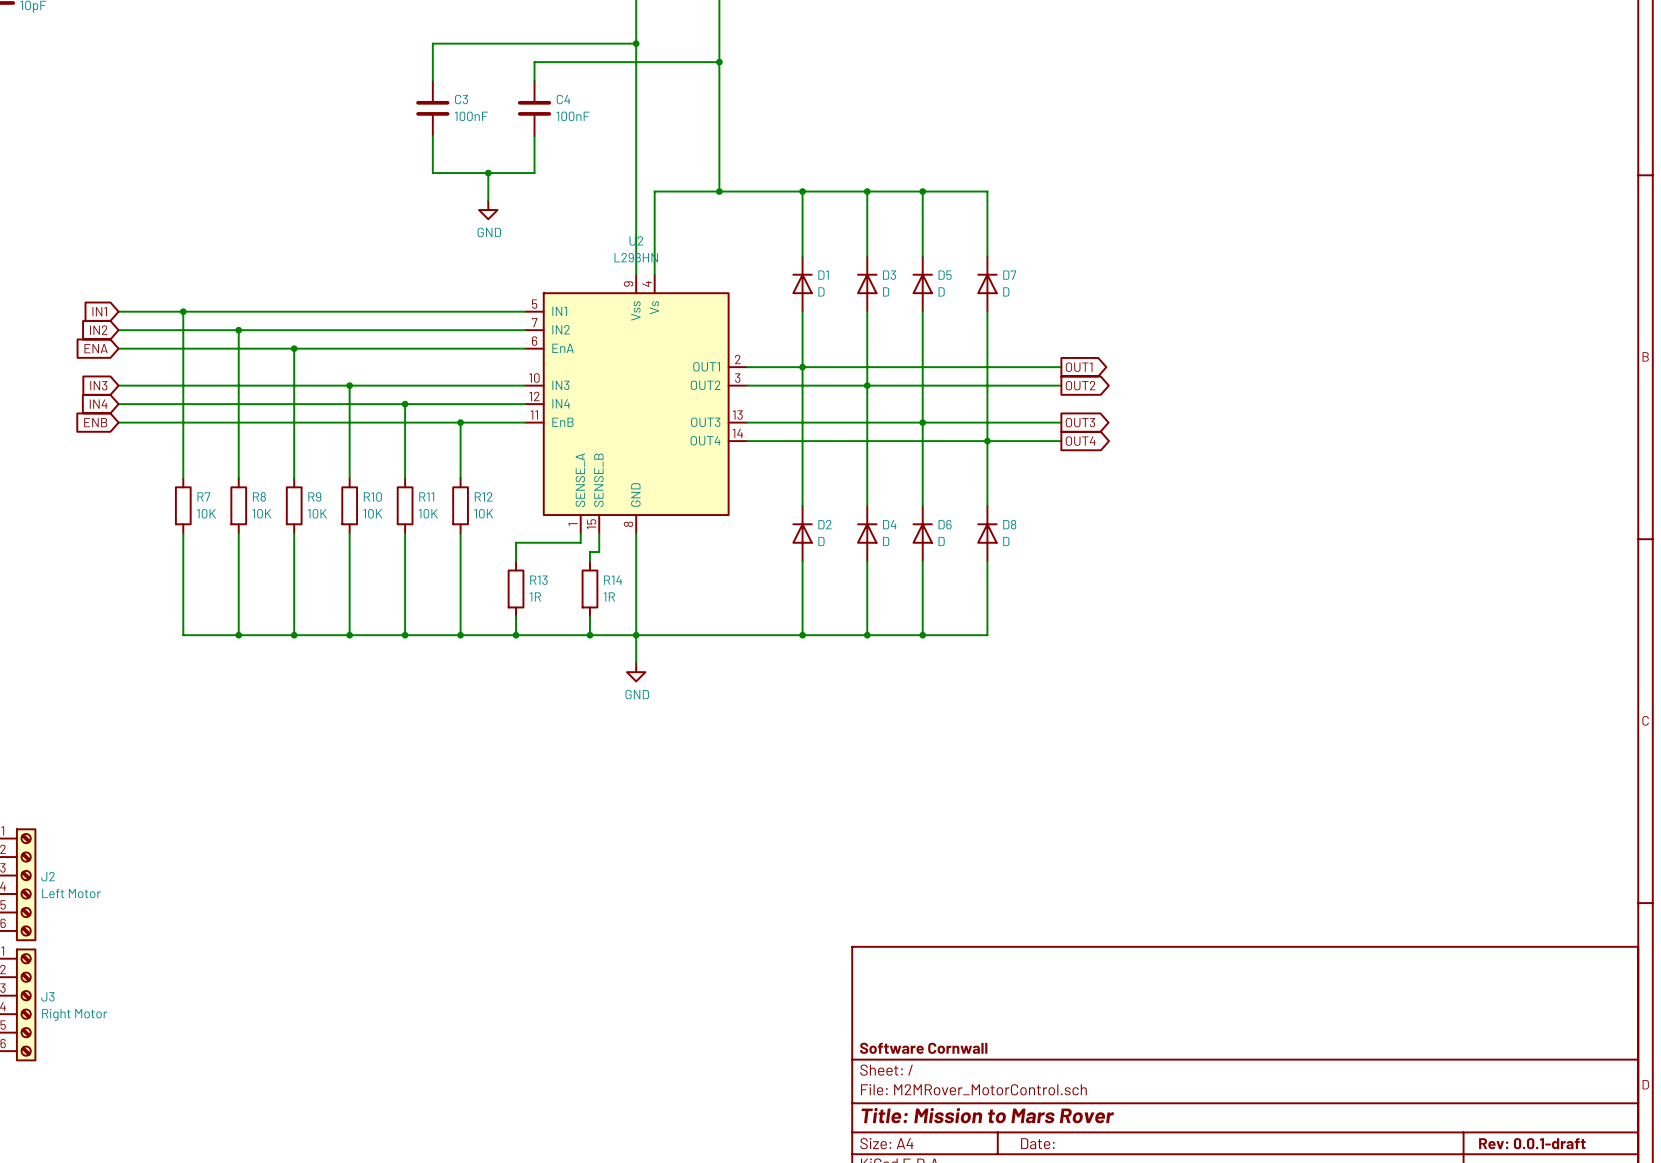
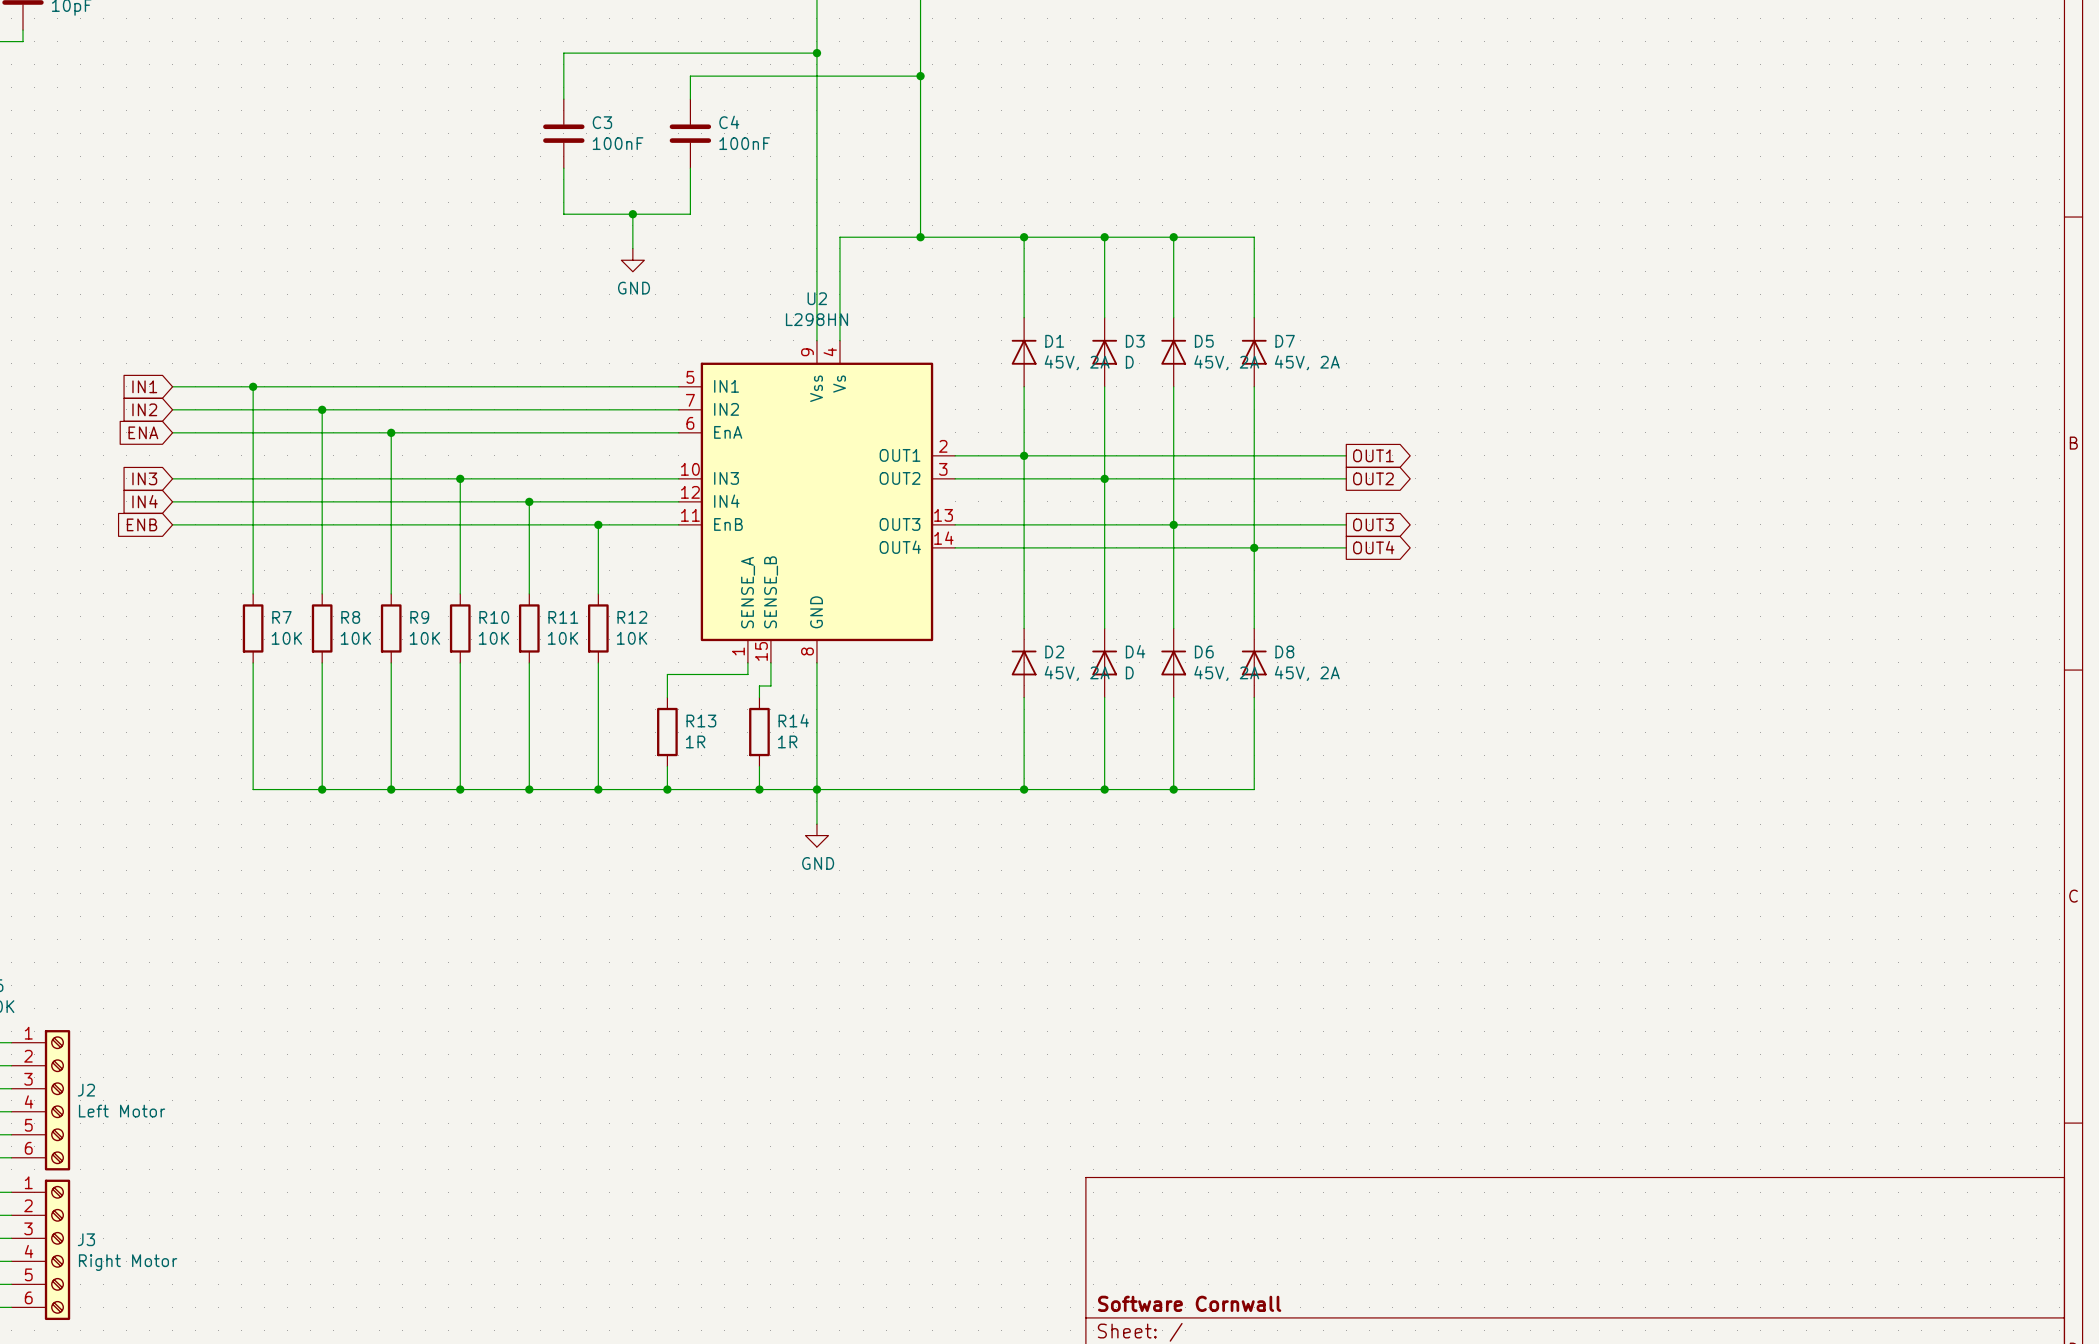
D1 value: D (821, 291) -> 45V, 2A (1077, 362)
D5 value: D (941, 291) -> 45V, 2A (1226, 362)
D7 value: D (1006, 291) -> 45V, 2A (1307, 362)
D2 value: D (821, 541) -> 45V, 2A (1077, 673)
D6 value: D (941, 541) -> 45V, 2A (1226, 673)
D8 value: D (1006, 541) -> 45V, 2A (1307, 673)

